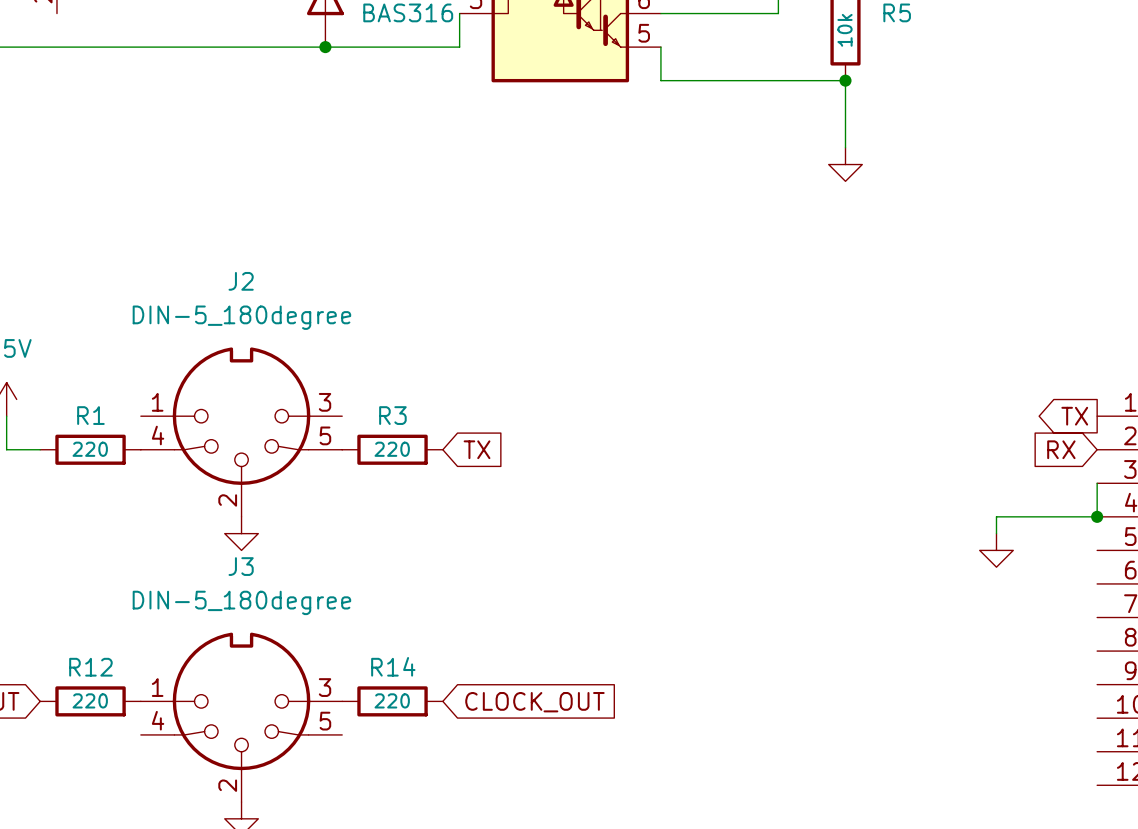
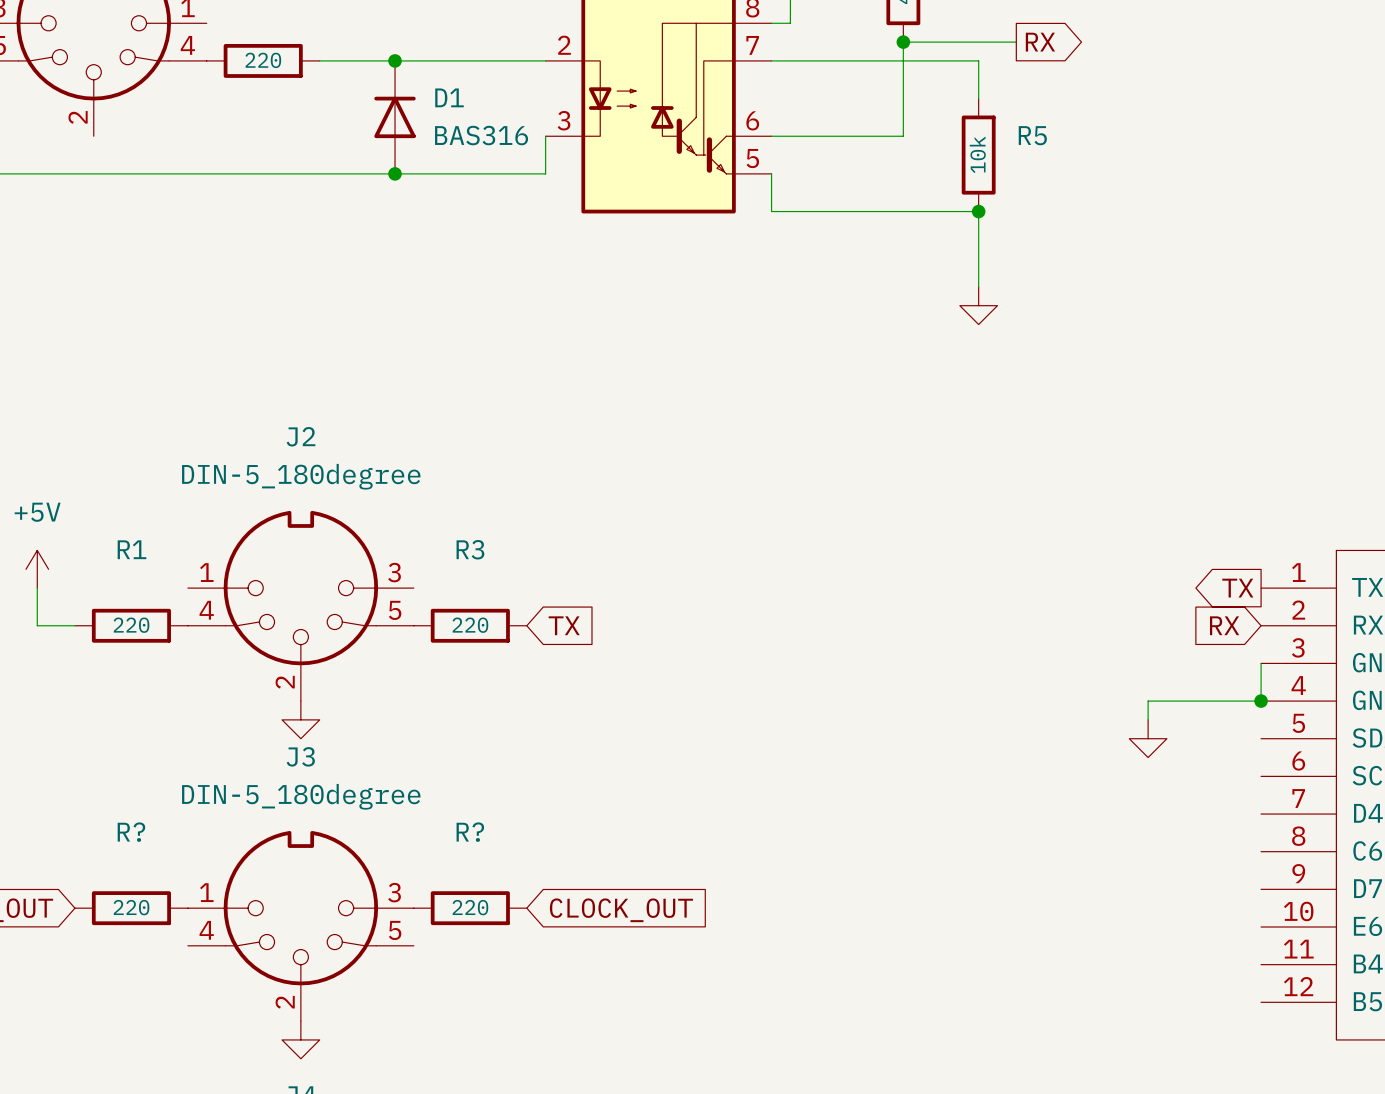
R1 name position: R1 (90, 415) -> R1 (132, 549)
R3 name position: R3 (392, 415) -> R3 (470, 549)
R14 name: R14 (393, 666) -> R? (470, 832)
R12 name: R12 (90, 667) -> R? (131, 832)

